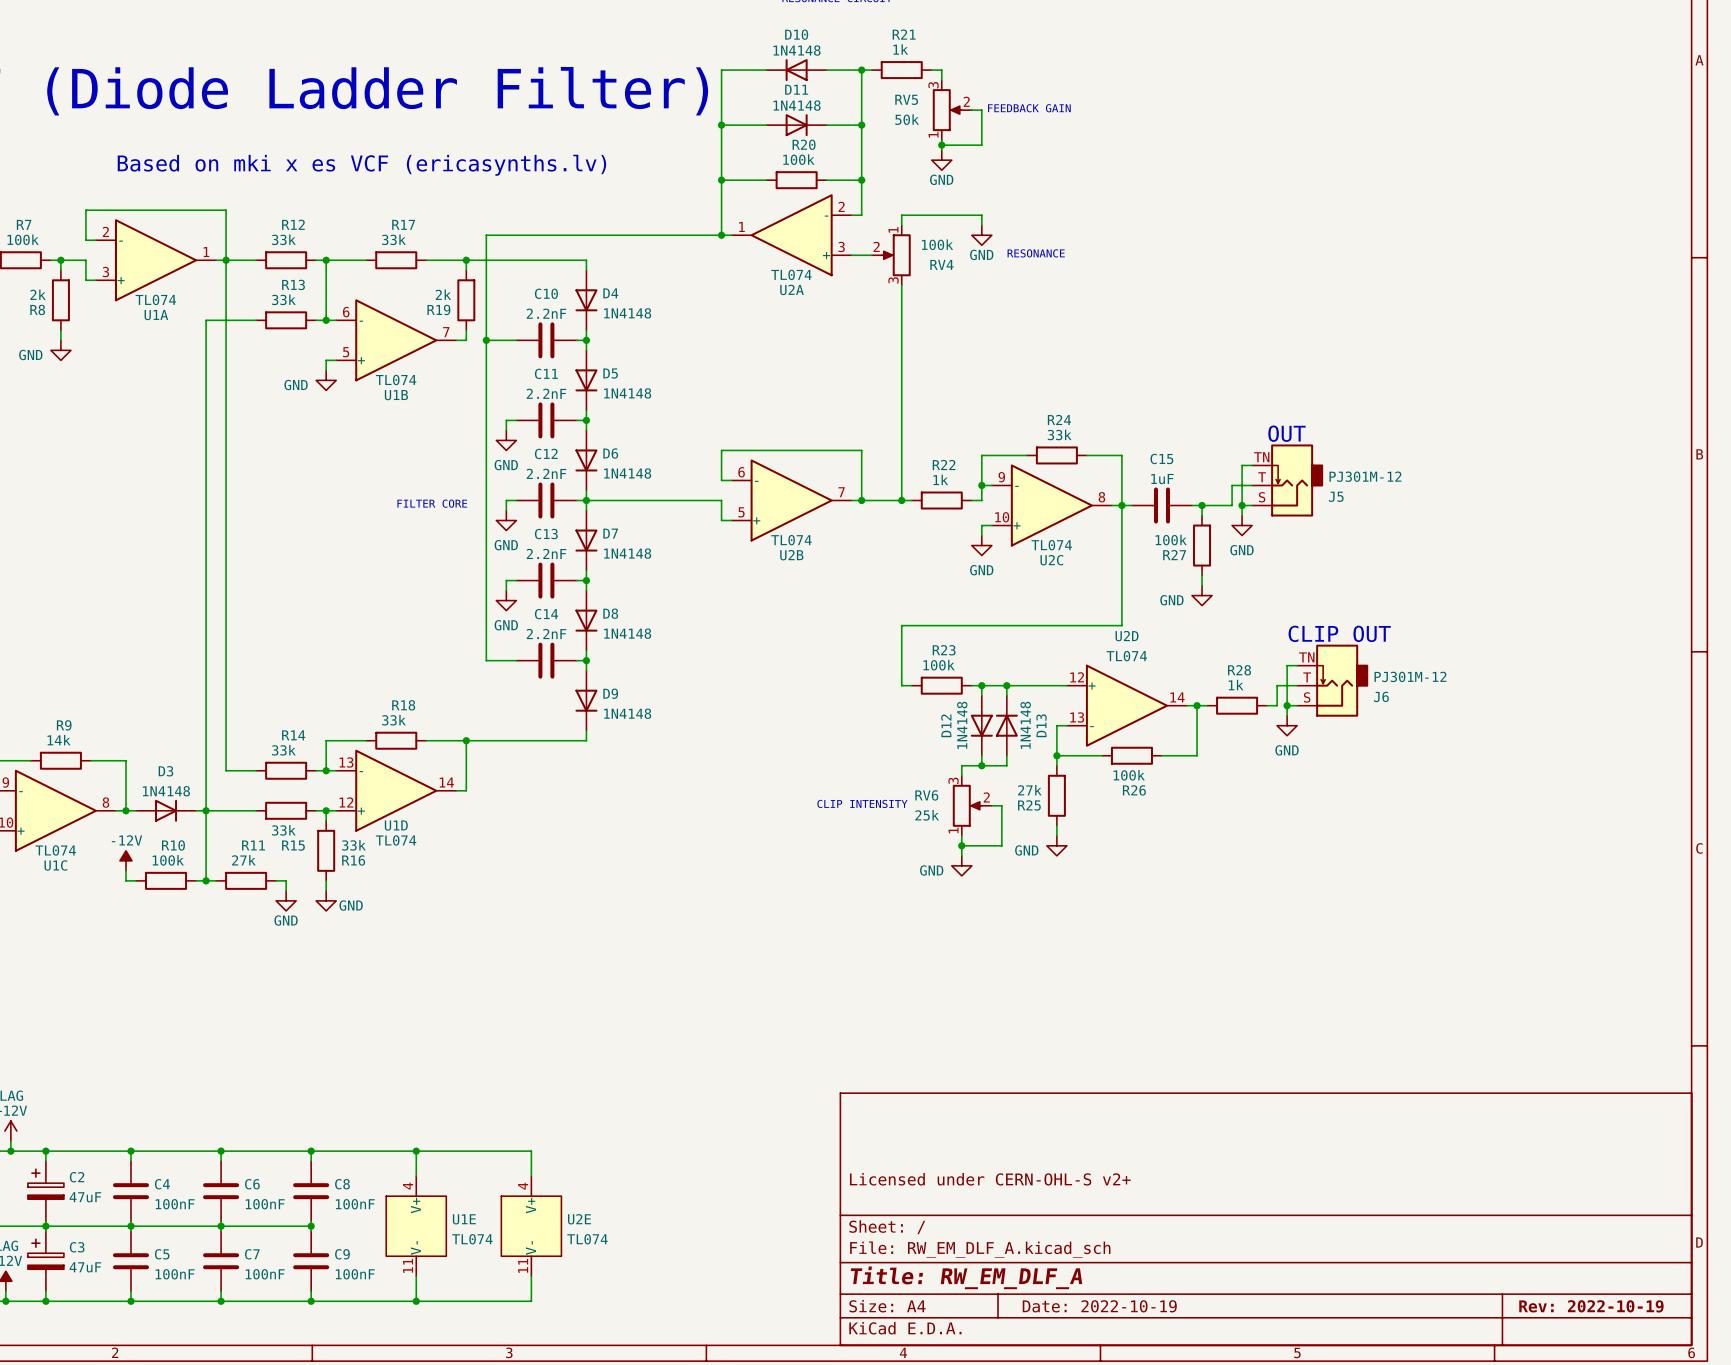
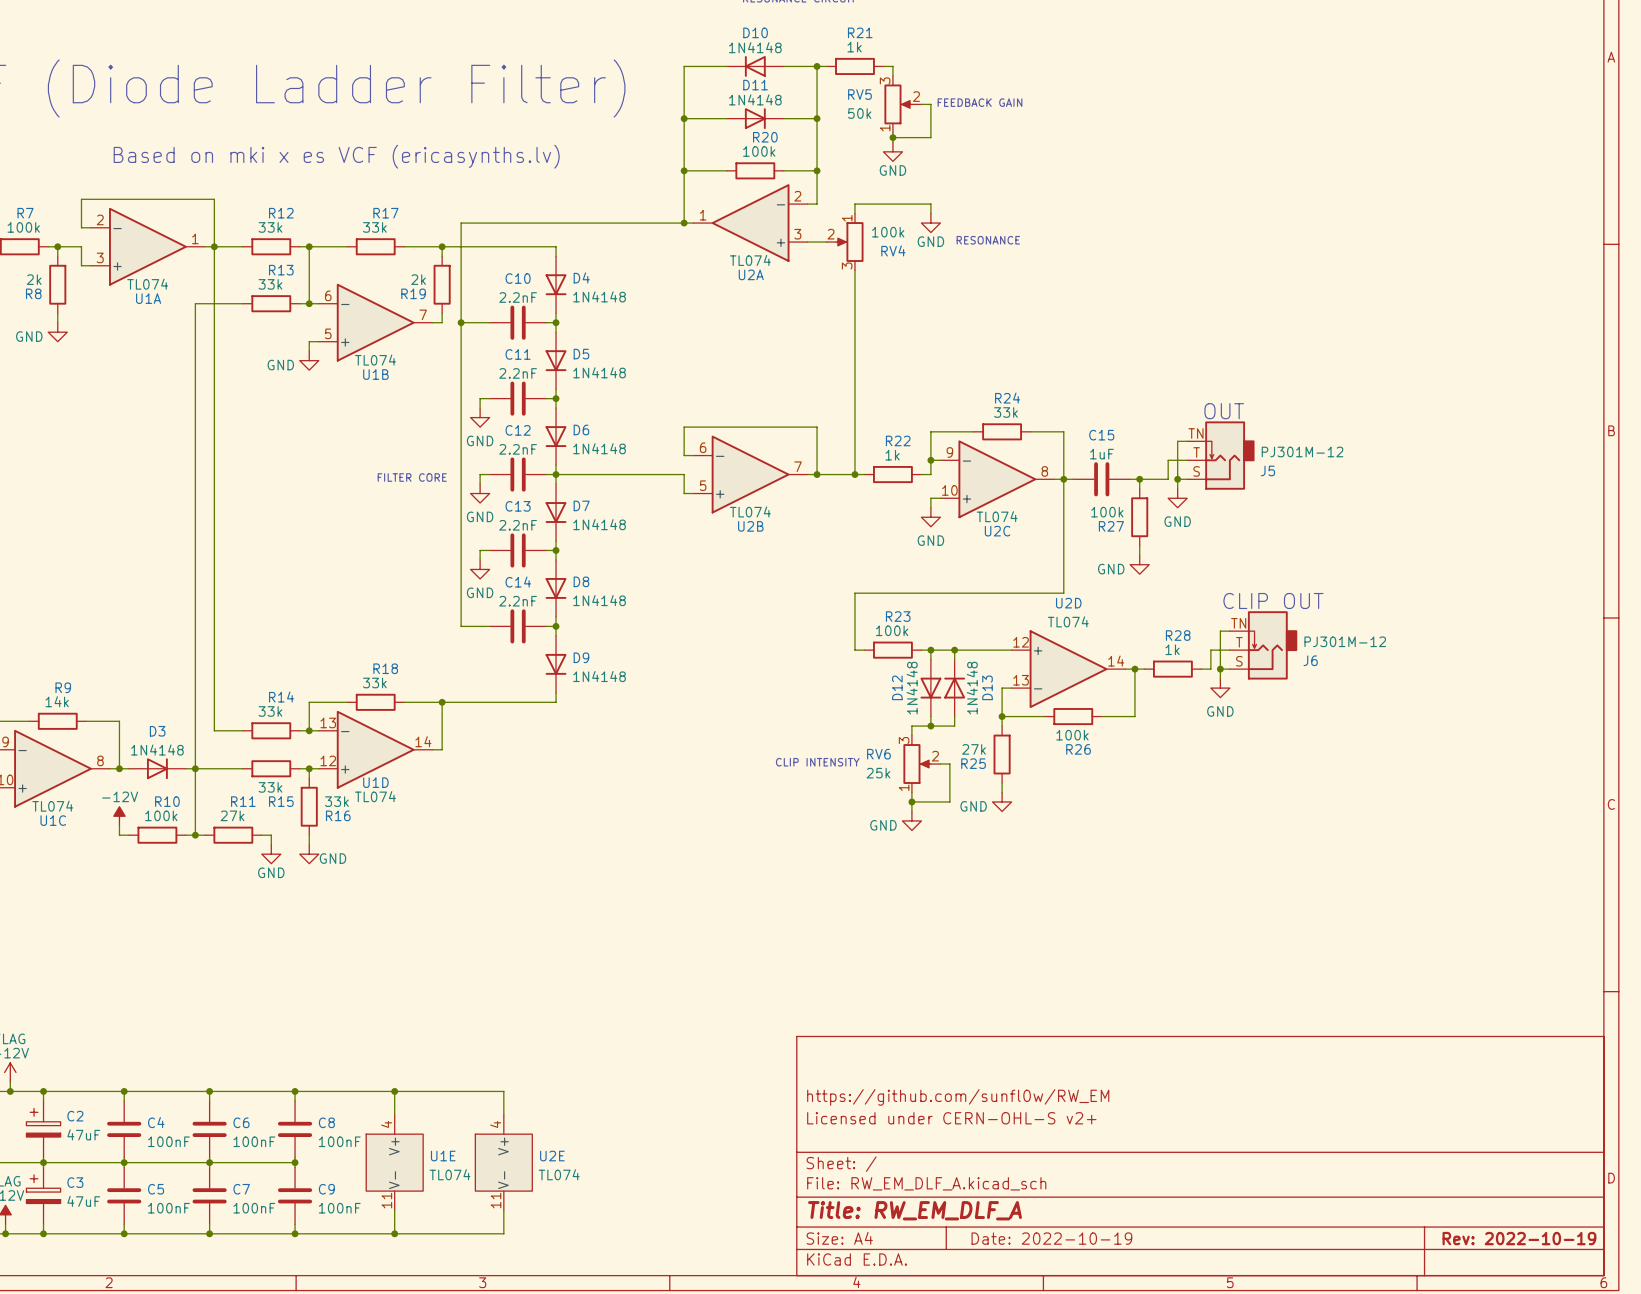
title block: none -> https://github.com/sunfl0w/RW_EM (958, 1097)

